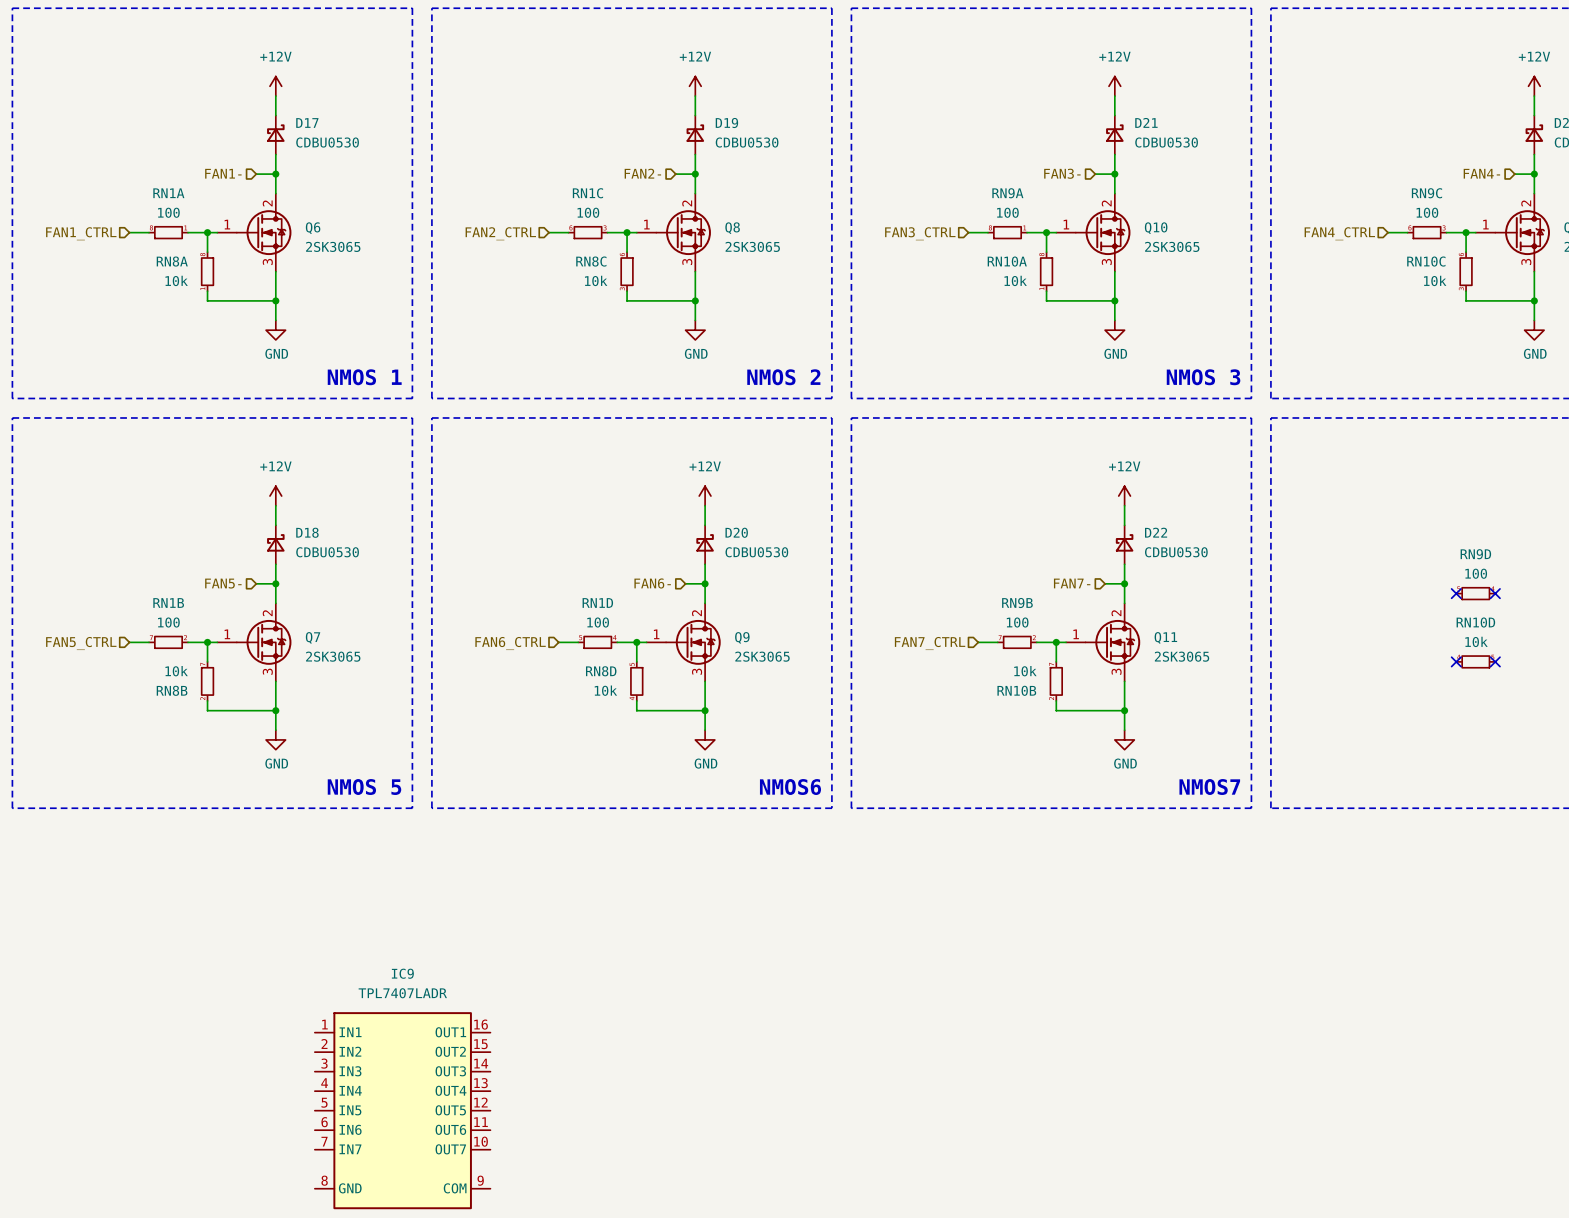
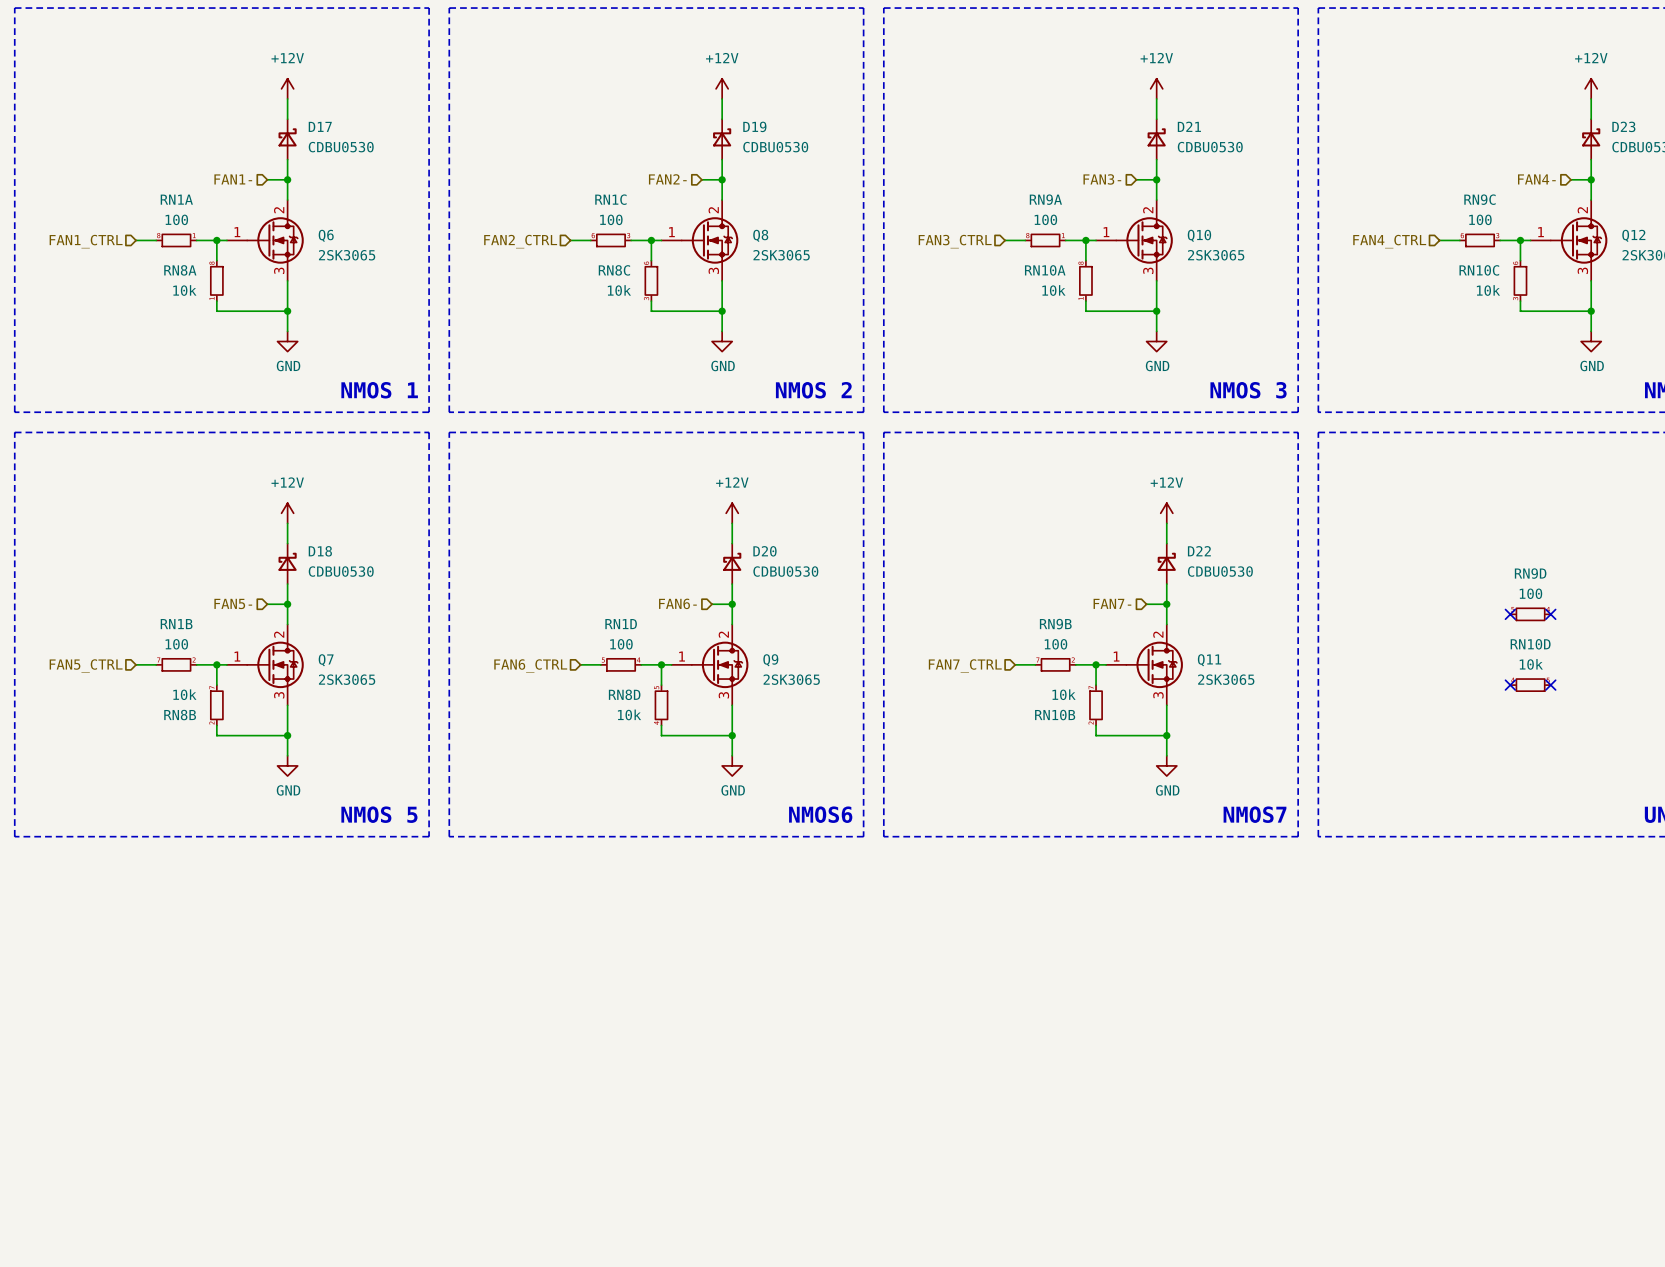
IC9: TPL7407LADR (402, 1110) -> none

